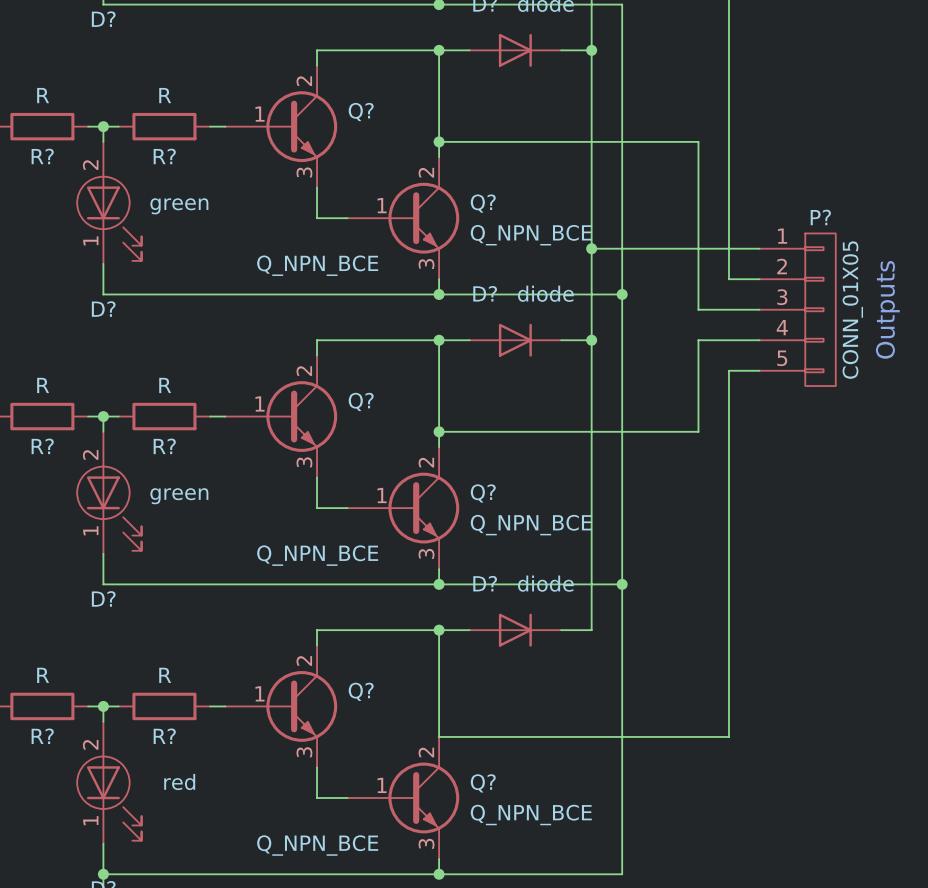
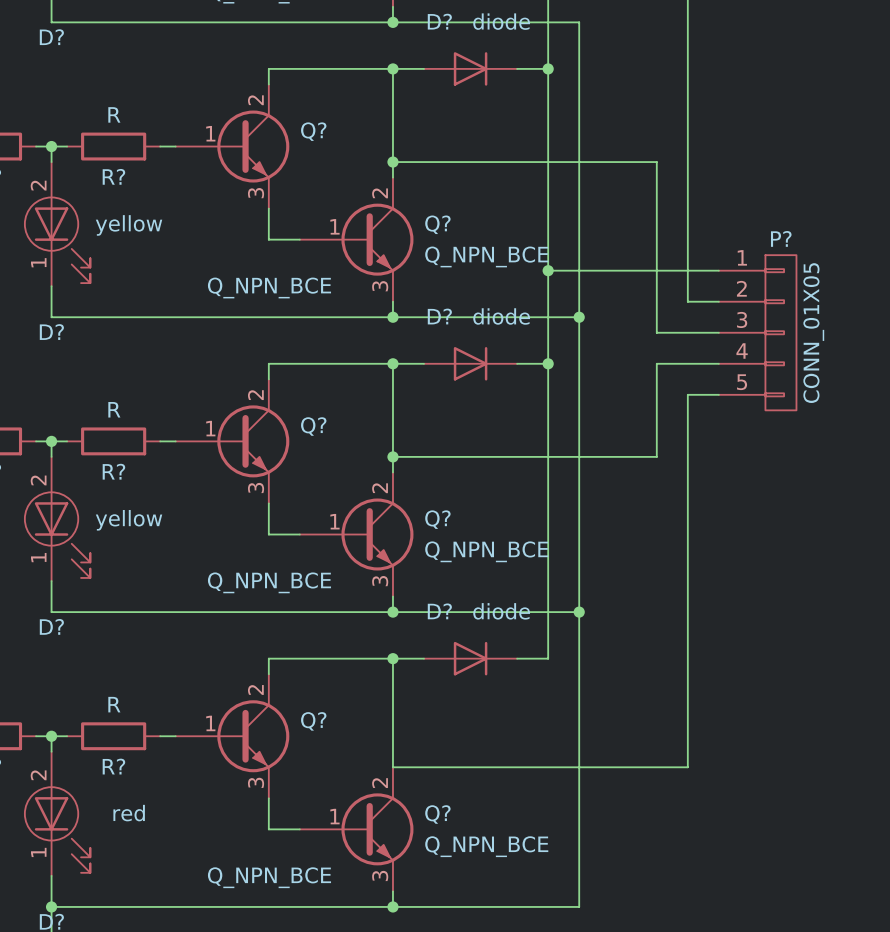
D? value: green (179, 206) -> yellow (129, 225)
text: Outputs (887, 309) -> none
D? value: green (179, 496) -> yellow (129, 520)

